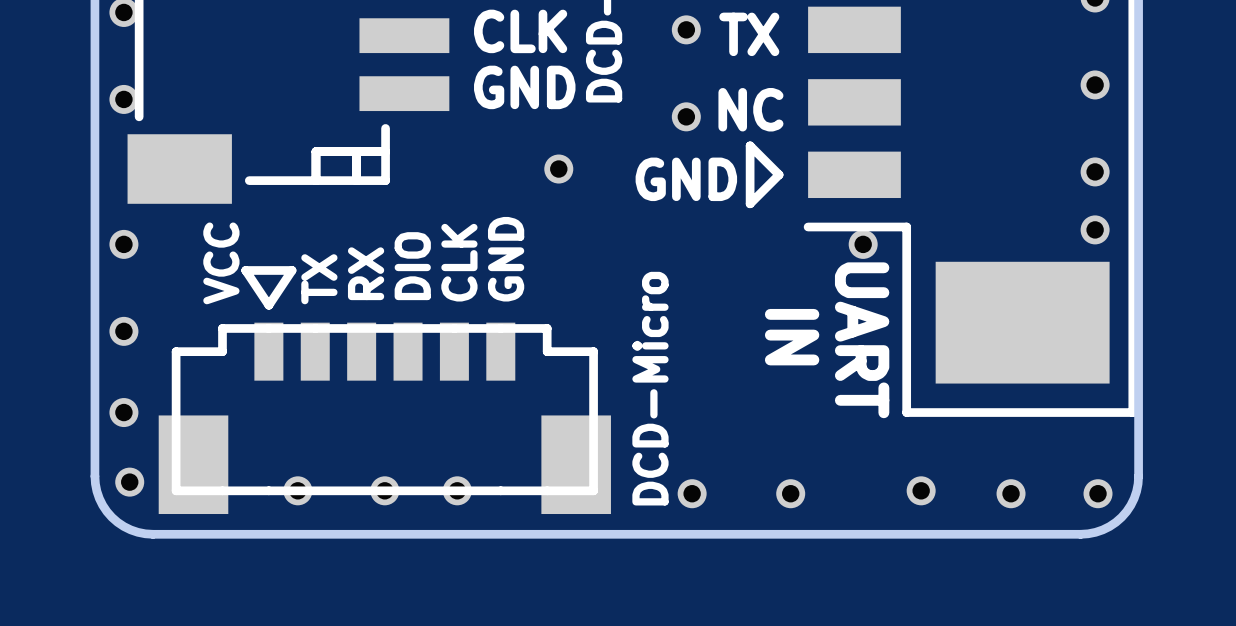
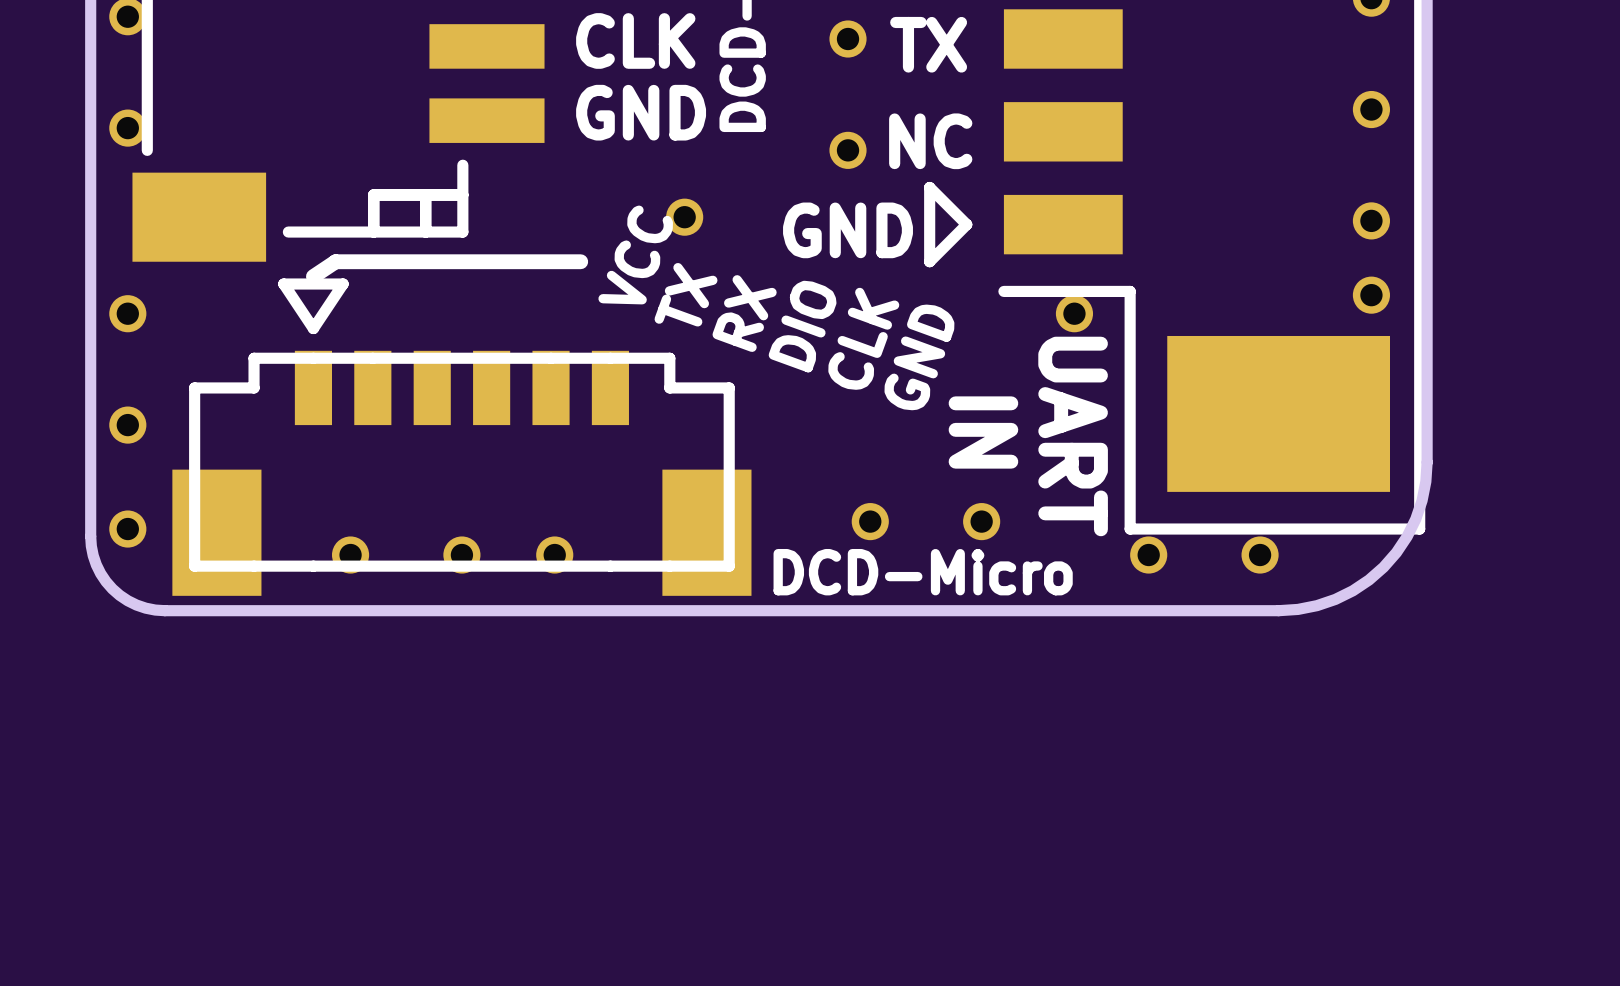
line: none -> (580, 261) (335, 261) (313, 276)
text rotation: 0° (506, 259) -> 20° clockwise (919, 357)
text position: GND (506, 259) -> GND (919, 357)
text rotation: 0° (459, 262) -> 20° clockwise (863, 338)
text position: CLK (459, 262) -> CLK (863, 338)
text rotation: 0° (221, 263) -> 20° clockwise (635, 254)
text position: VCC (221, 263) -> VCC (635, 254)
text rotation: 0° (412, 266) -> 20° clockwise (802, 326)
text position: DIO (412, 266) -> DIO (802, 326)
text rotation: 0° (366, 273) -> 20° clockwise (744, 313)
text position: RX (366, 273) -> RX (744, 313)
text rotation: 0° (319, 279) -> 20° clockwise (686, 294)
text position: TX (319, 279) -> TX (686, 294)
board edge: (1138, 360) (1138, 476) (1136, 491) (1130, 505) (1115, 522) (1102, 529) (1080, 534) (145, 533) (130, 529) (117, 522) (106, 511) (99, 498) (94, 476) (94, 418) -> (1427, 462) (1422, 500) (1415, 519) (1396, 552) (1383, 567) (1369, 580) (1335, 599) (1317, 605) (1278, 610) (164, 610) (136, 605) (112, 588) (96, 564) (90, 536)
text rotation: 0° (650, 388) -> 90° clockwise (923, 572)
part position: (384, 390) -> (461, 437)
part: none -> (870, 521)
part: none -> (981, 521)
part: none -> (350, 555)
part: none -> (461, 555)
part: none -> (554, 555)
part: none -> (1148, 555)
part: none -> (1260, 555)
part: (129, 482) -> none
part: (297, 490) -> none
part: (384, 490) -> none
part: (457, 490) -> none
part: (921, 490) -> none
part: (692, 493) -> none
part: (790, 493) -> none
part: (1011, 493) -> none
part: (1098, 493) -> none

